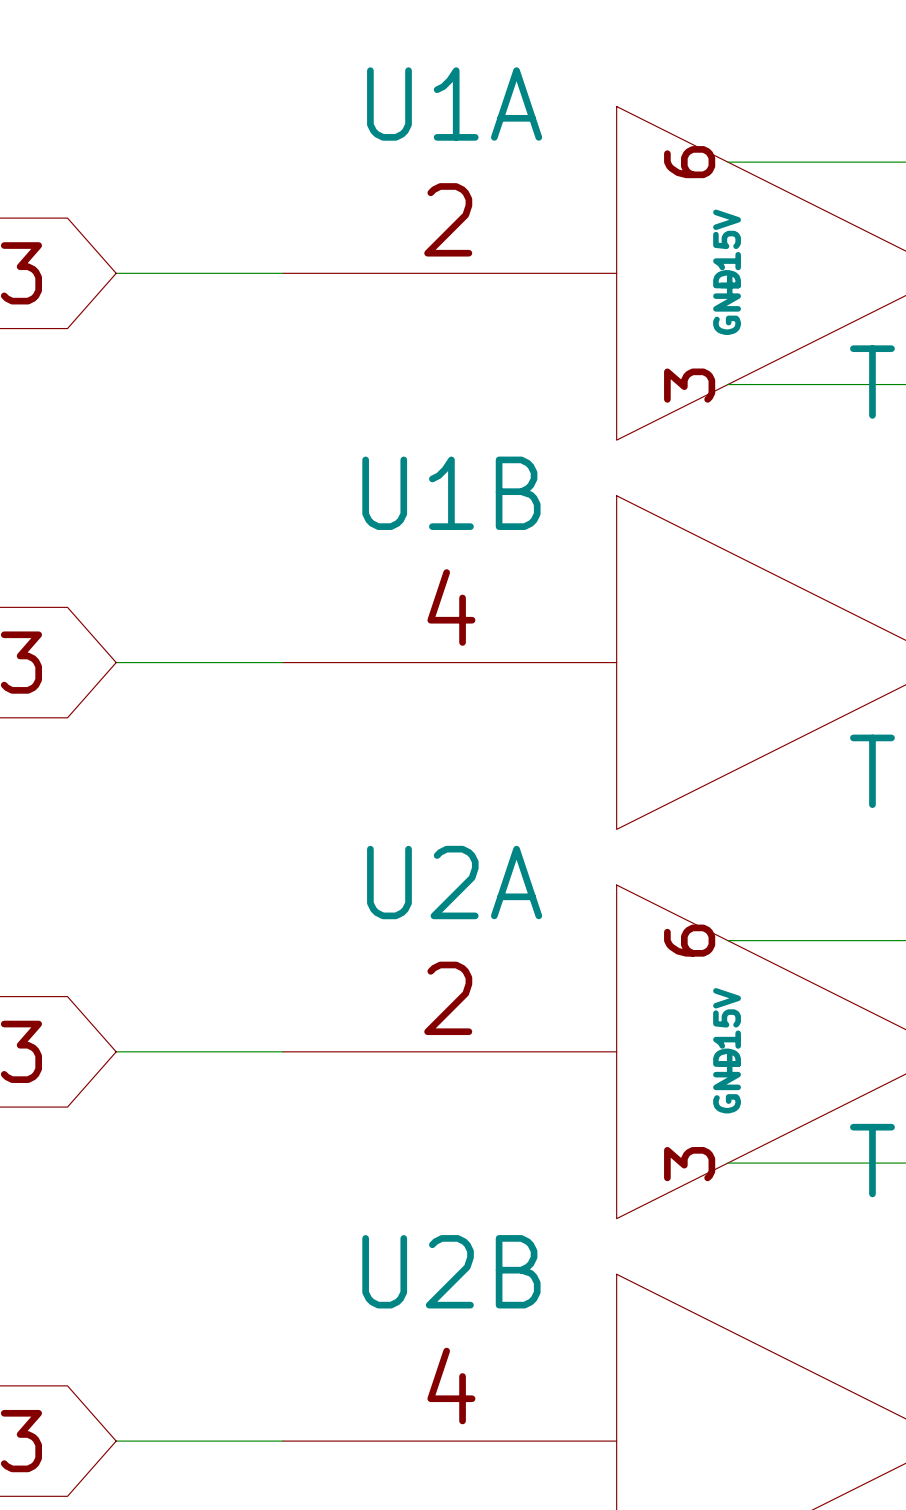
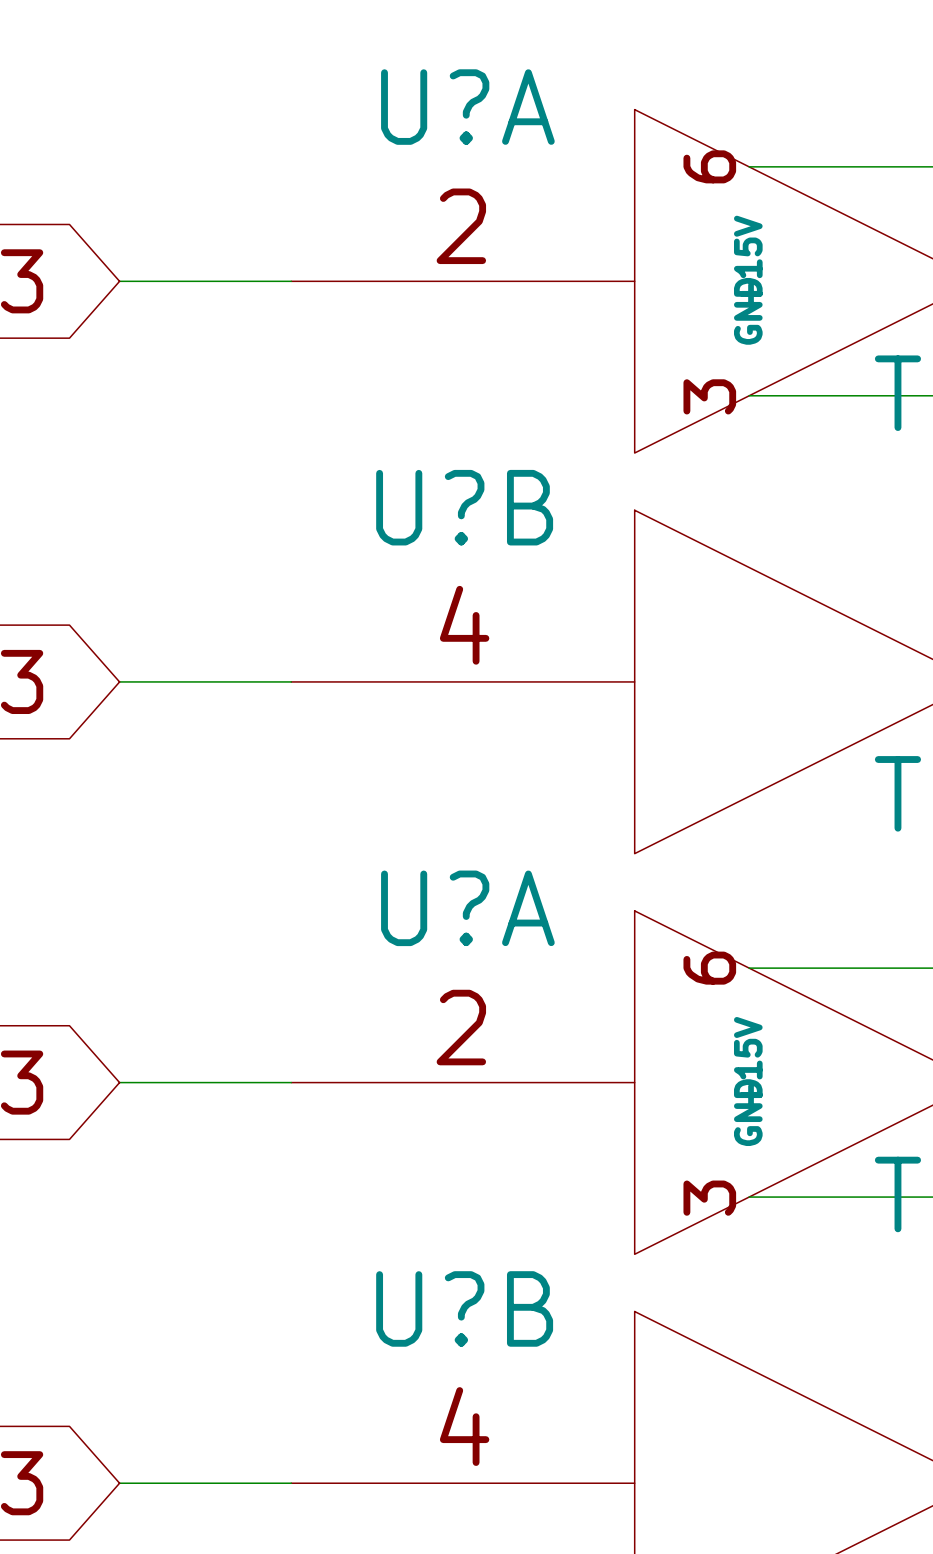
U1A name: U1A (454, 104) -> U?A (467, 107)
U1B name: U1B (451, 493) -> U?B (464, 507)
U2A name: U2A (454, 882) -> U?A (467, 908)
U2B name: U2B (451, 1271) -> U?B (464, 1308)

